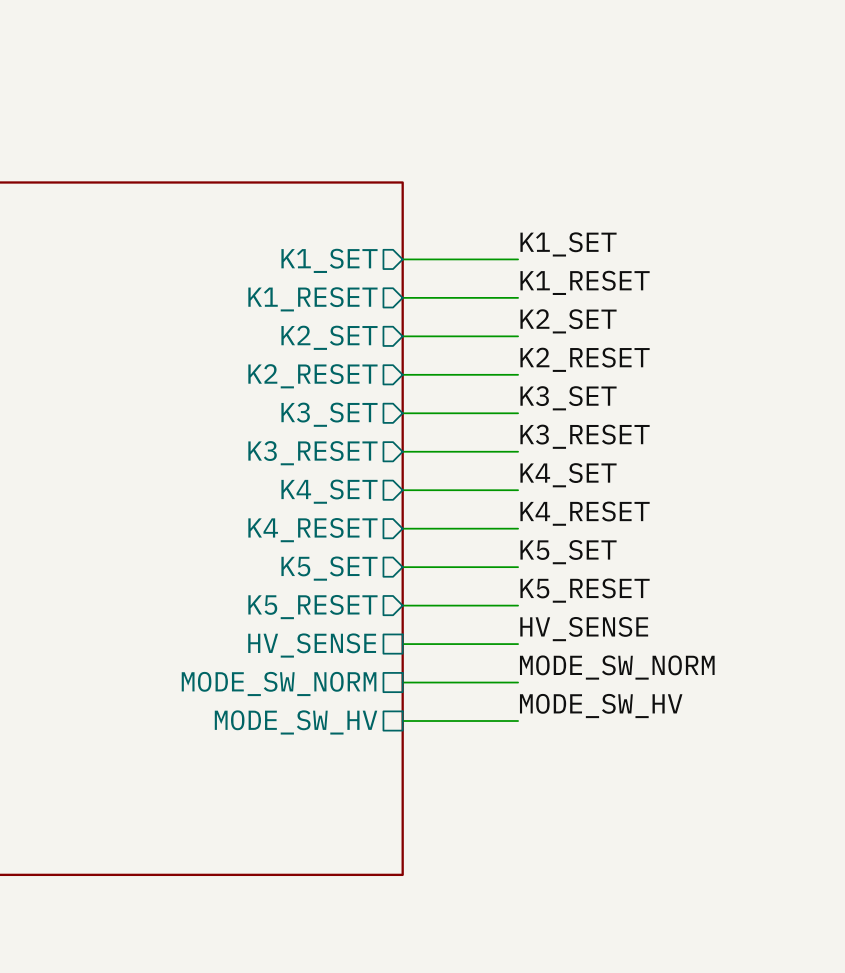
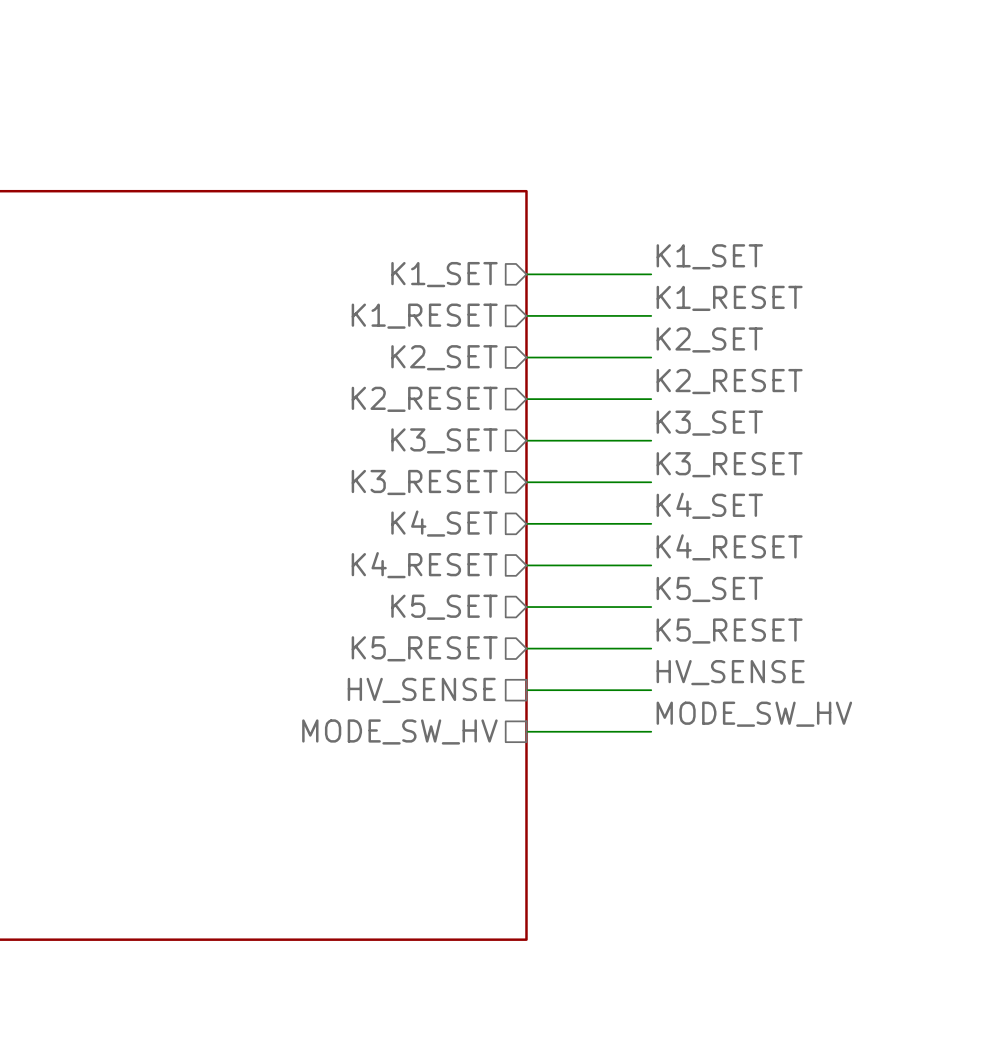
label: MODE_SW_NORM (617, 667) -> MODE_SW_HV (754, 714)
sheet pin: MODE_SW_NORM (279, 683) -> MODE_SW_HV (399, 731)
label: MODE_SW_HV (601, 706) -> none
wire: (402, 721) (518, 721) -> none
sheet pin: MODE_SW_HV (296, 722) -> none

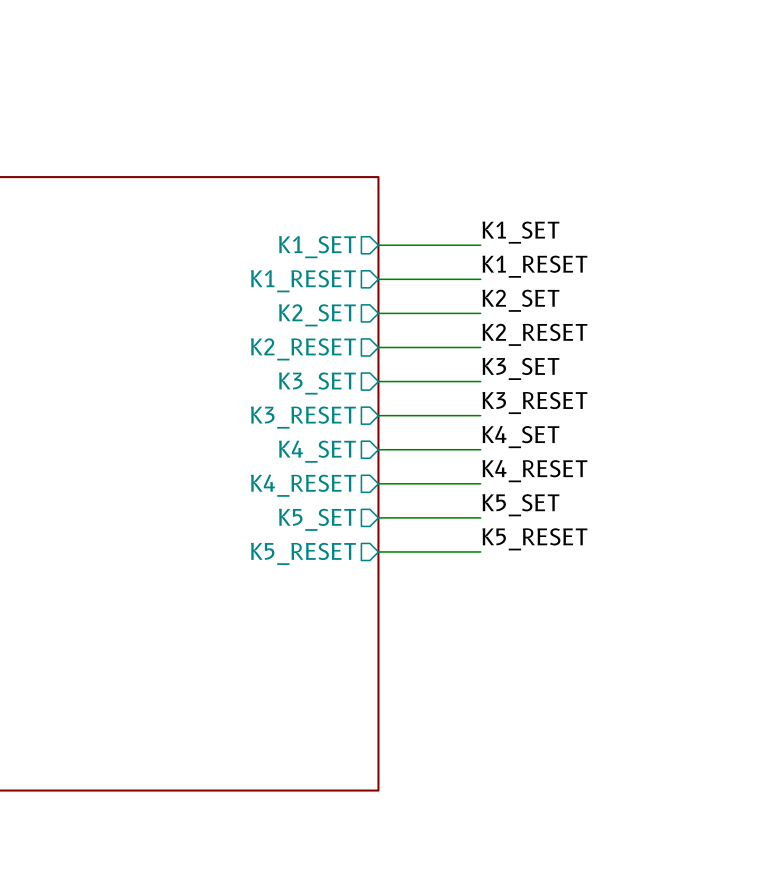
label: HV_SENSE (730, 672) -> none
sheet pin: HV_SENSE (421, 690) -> none
wire: (526, 690) (651, 690) -> none
label: MODE_SW_HV (754, 714) -> none
sheet pin: MODE_SW_HV (399, 731) -> none
wire: (526, 731) (651, 731) -> none

